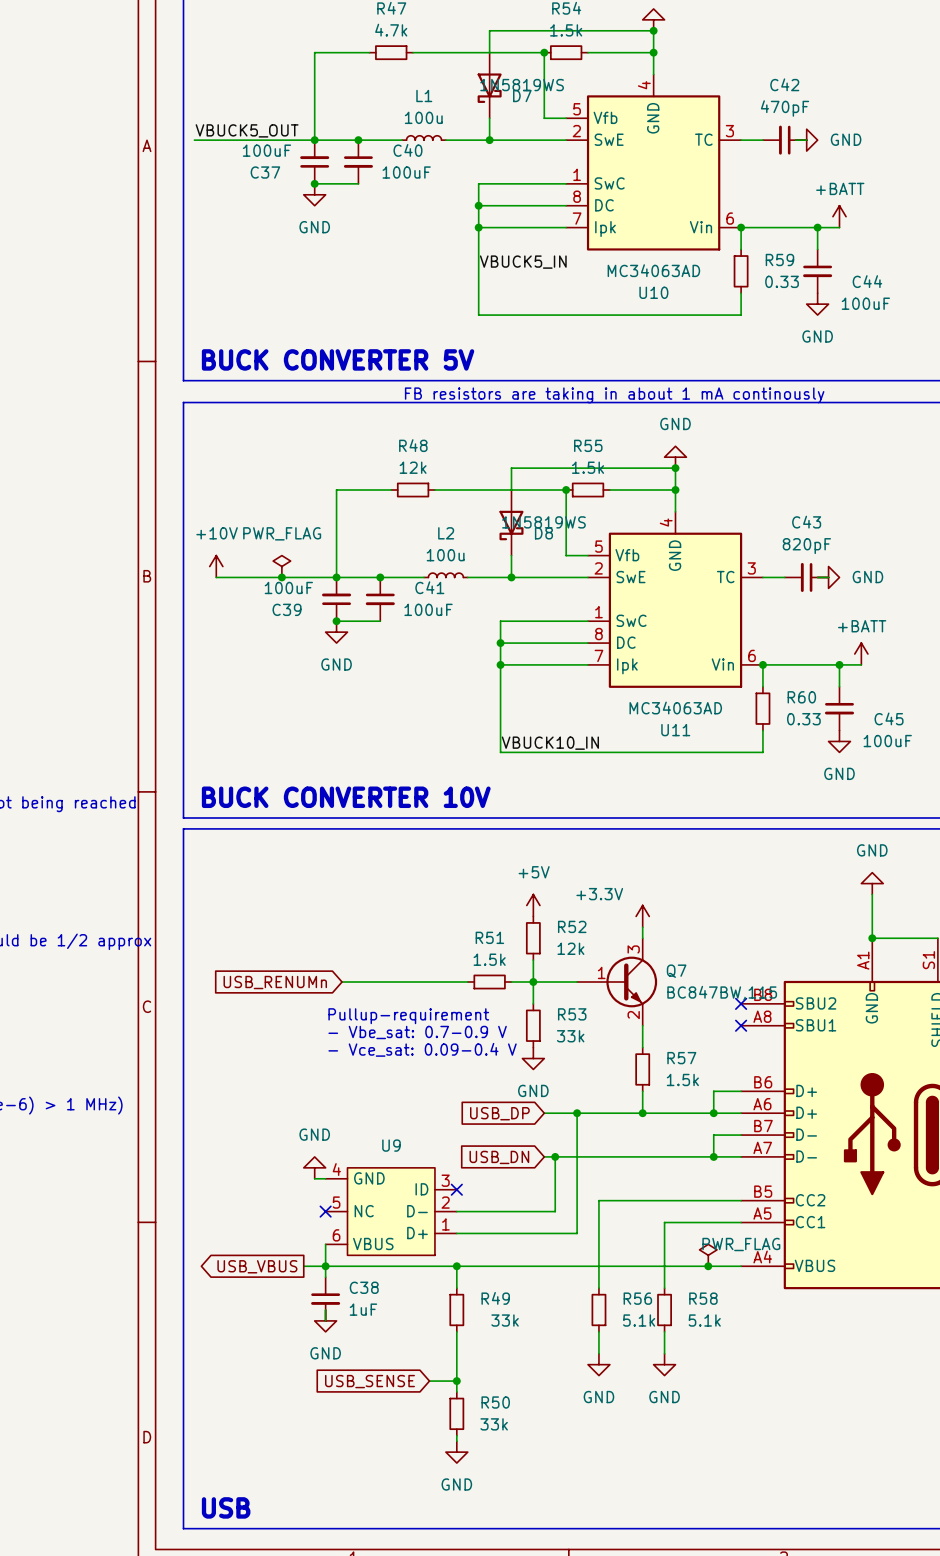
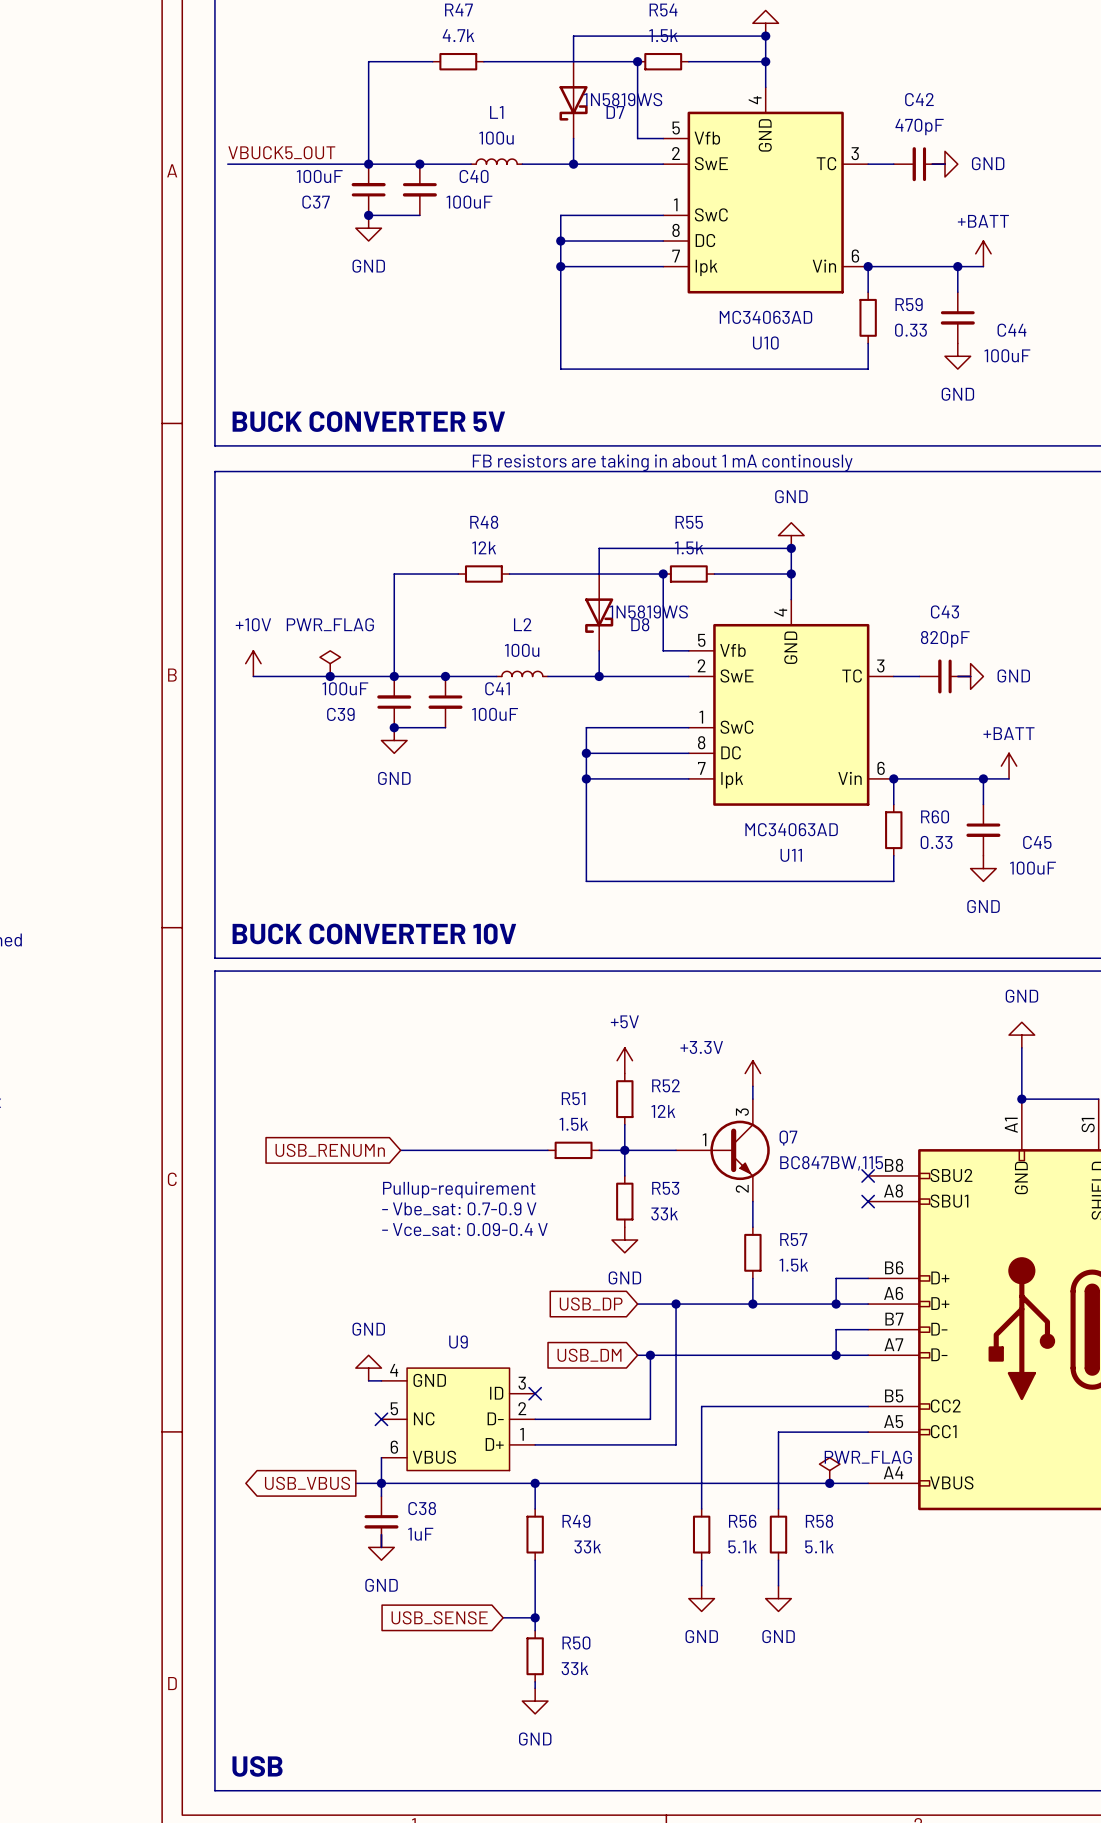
label: VBUCK5_IN (523, 262) -> none
label: VBUCK10_IN (550, 743) -> none
global label: USB_DN (499, 1157) -> USB_DM (589, 1355)

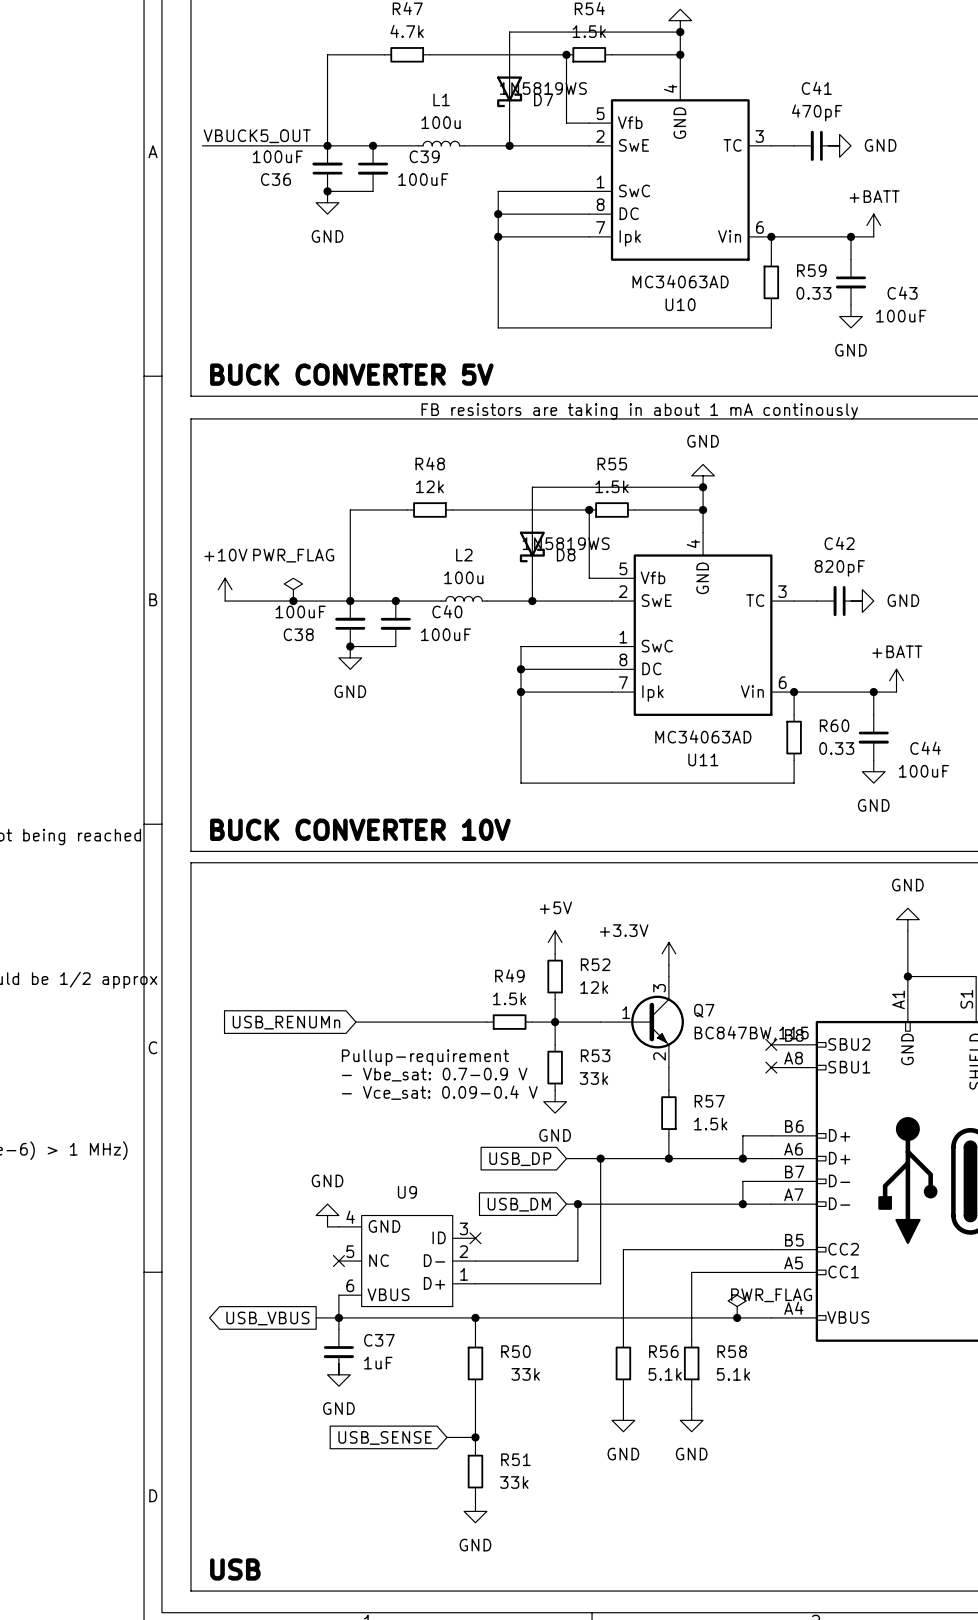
C42 name: C42 (919, 99) -> C41 (816, 88)
C40 name: C40 (474, 176) -> C39 (424, 156)
C37 name: C37 (316, 202) -> C36 (275, 179)
C44 name: C44 (1011, 330) -> C43 (902, 293)
C43 name: C43 (944, 611) -> C42 (839, 543)
C41 name: C41 (497, 688) -> C40 (447, 611)
C39 name: C39 (340, 714) -> C38 (298, 634)
C45 name: C45 (1037, 842) -> C44 (925, 748)
R51 name: R51 (573, 1098) -> R49 (509, 975)
C38 name: C38 (422, 1508) -> C37 (379, 1340)
R49 name: R49 (576, 1521) -> R50 (515, 1351)
R50 name: R50 (576, 1642) -> R51 (515, 1459)

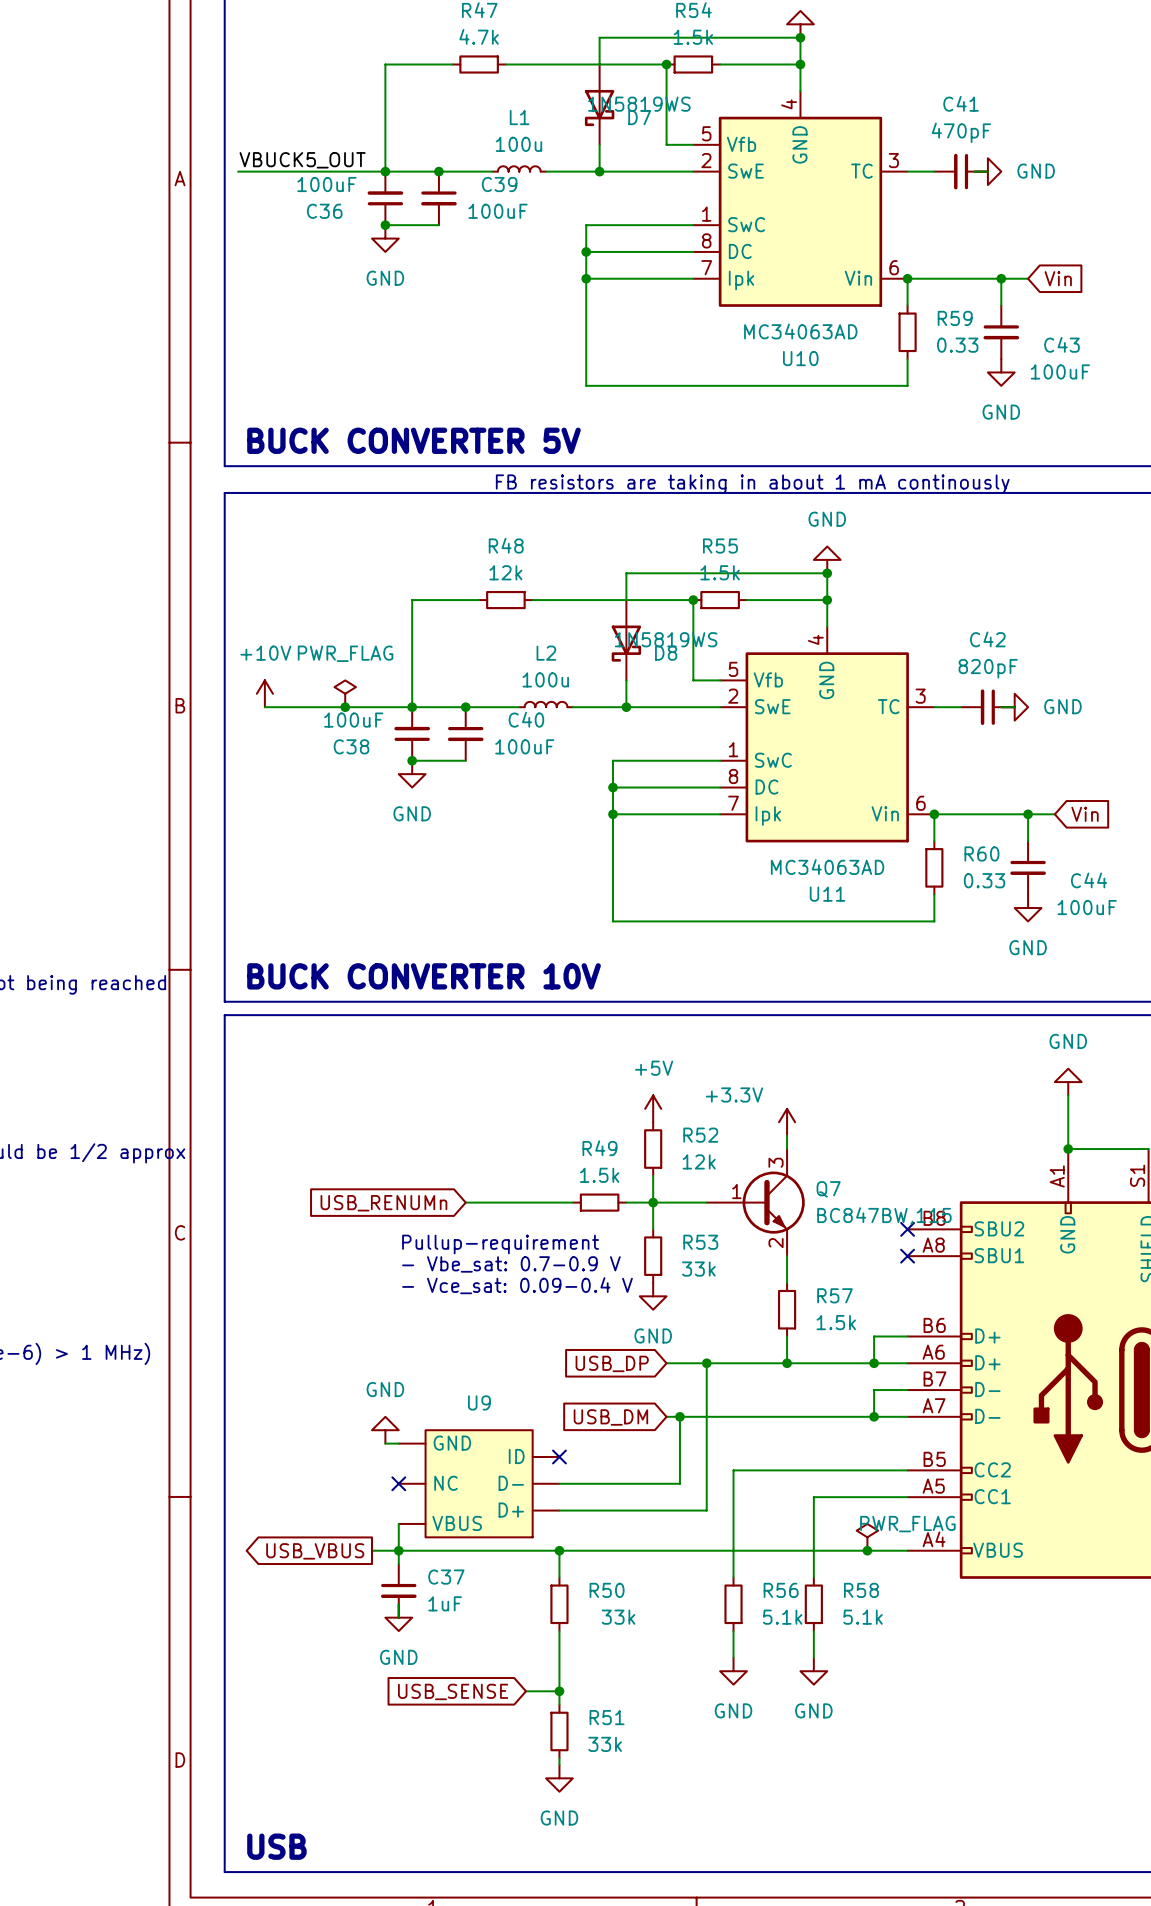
power symbol: +BATT (873, 225) -> none
global label: none -> Vin (1058, 278)
power symbol: +BATT (896, 680) -> none
global label: none -> Vin (1085, 814)
global label position: USB_RENUMn (286, 1022) -> USB_RENUMn (383, 1203)
wire: (355, 1022) (395, 1022) -> none
U9 pin number: 4 (350, 1217) -> none
U9 pin number: 3 (463, 1228) -> none
U9 pin number: 5 (350, 1251) -> none
U9 pin number: 2 (463, 1251) -> none
U9 pin number: 1 (464, 1274) -> none
U9 pin number: 6 (350, 1285) -> none

